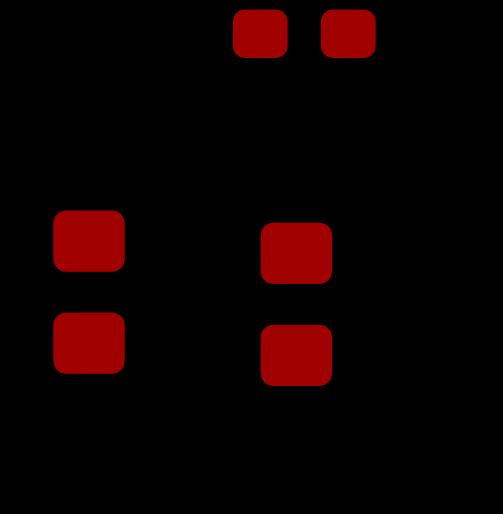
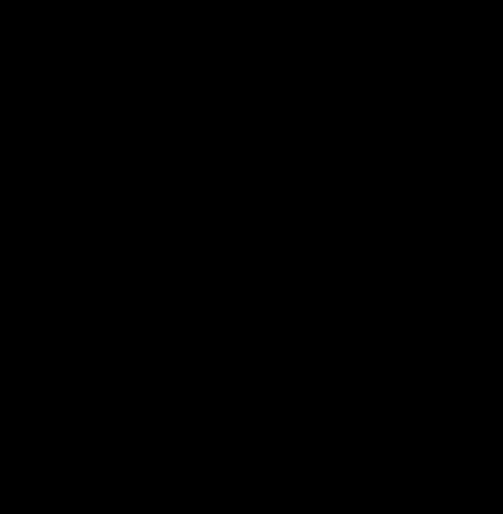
part: (304, 33) -> none
part: (89, 292) -> none
part: (296, 304) -> none

